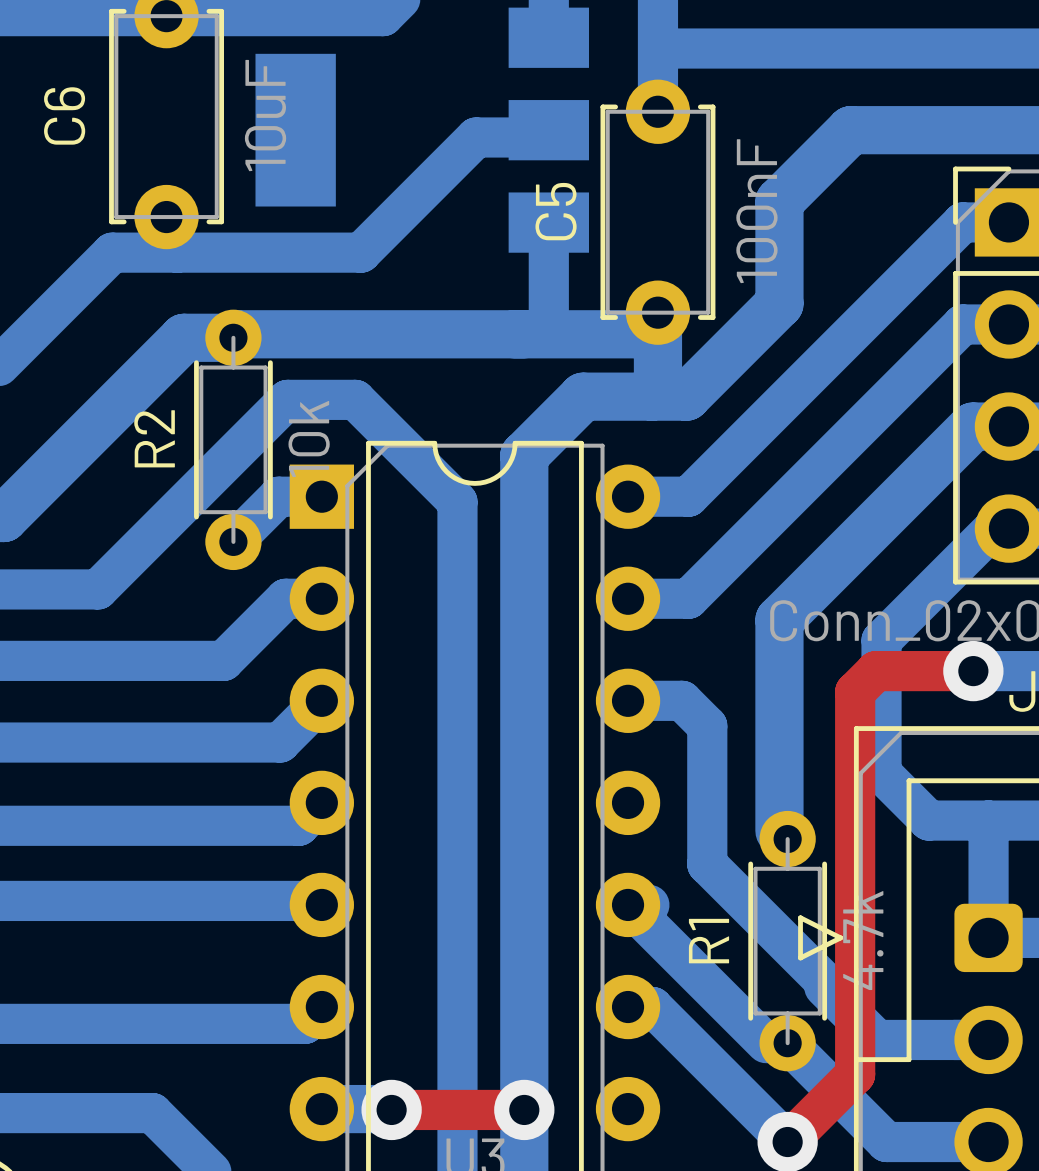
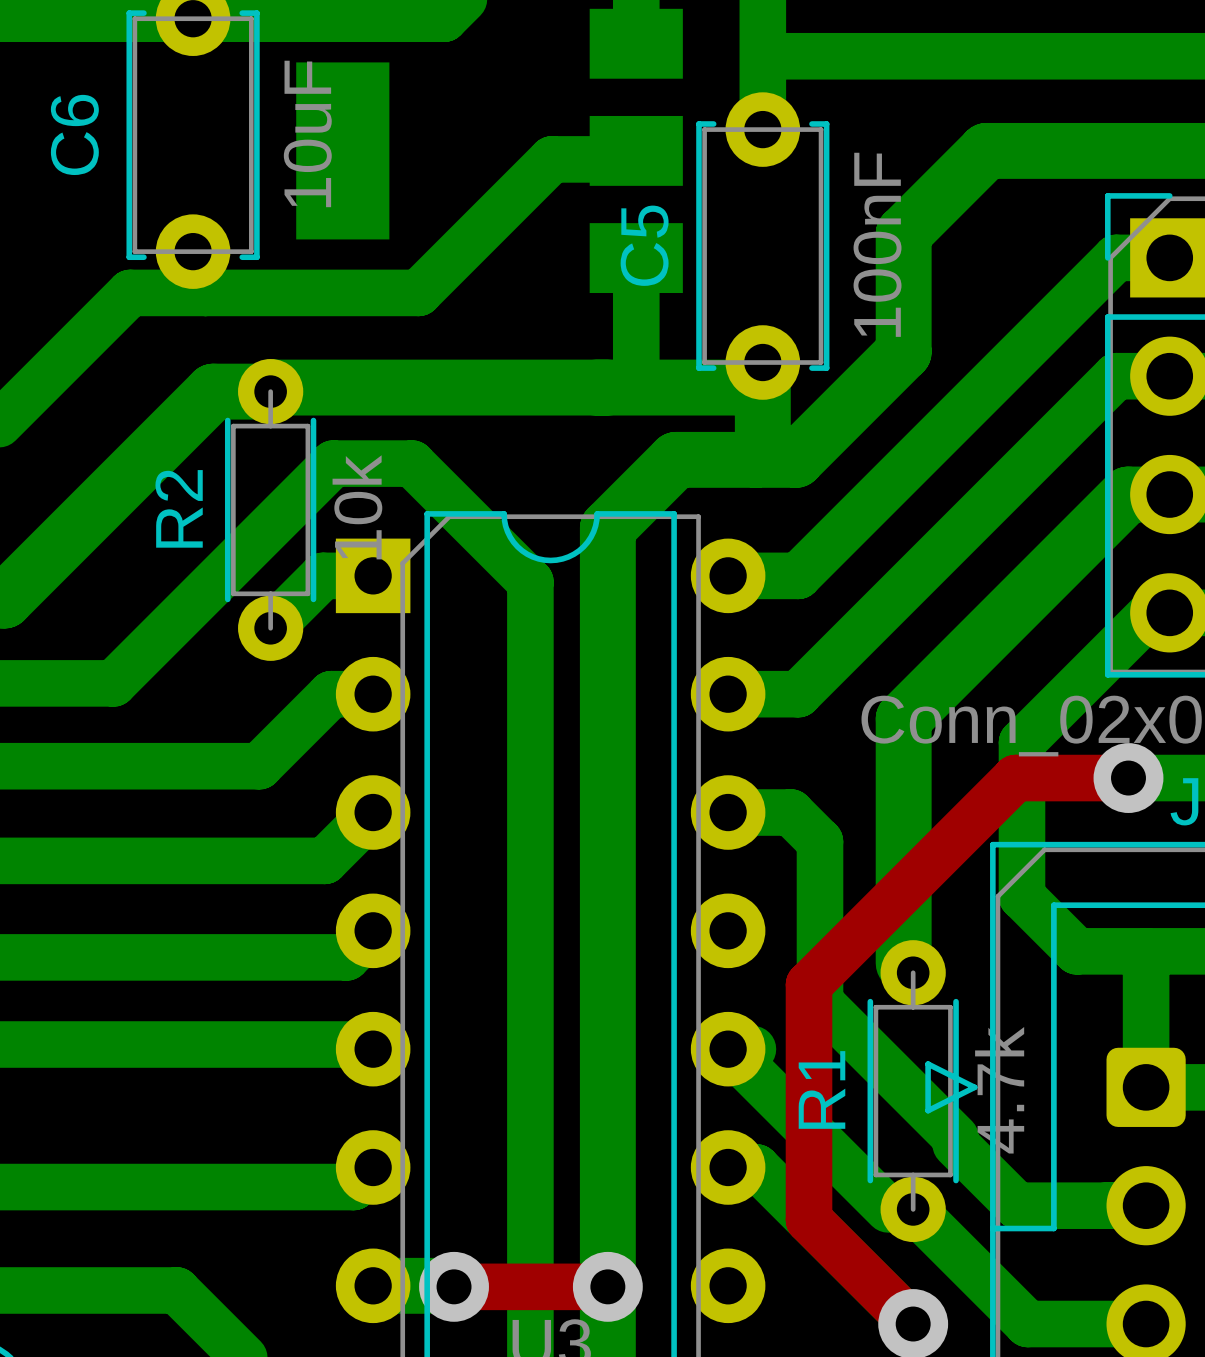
top track: (855, 691) (855, 1074) (787, 1142) -> (991, 802) (809, 984) (809, 1219) (913, 1324)

